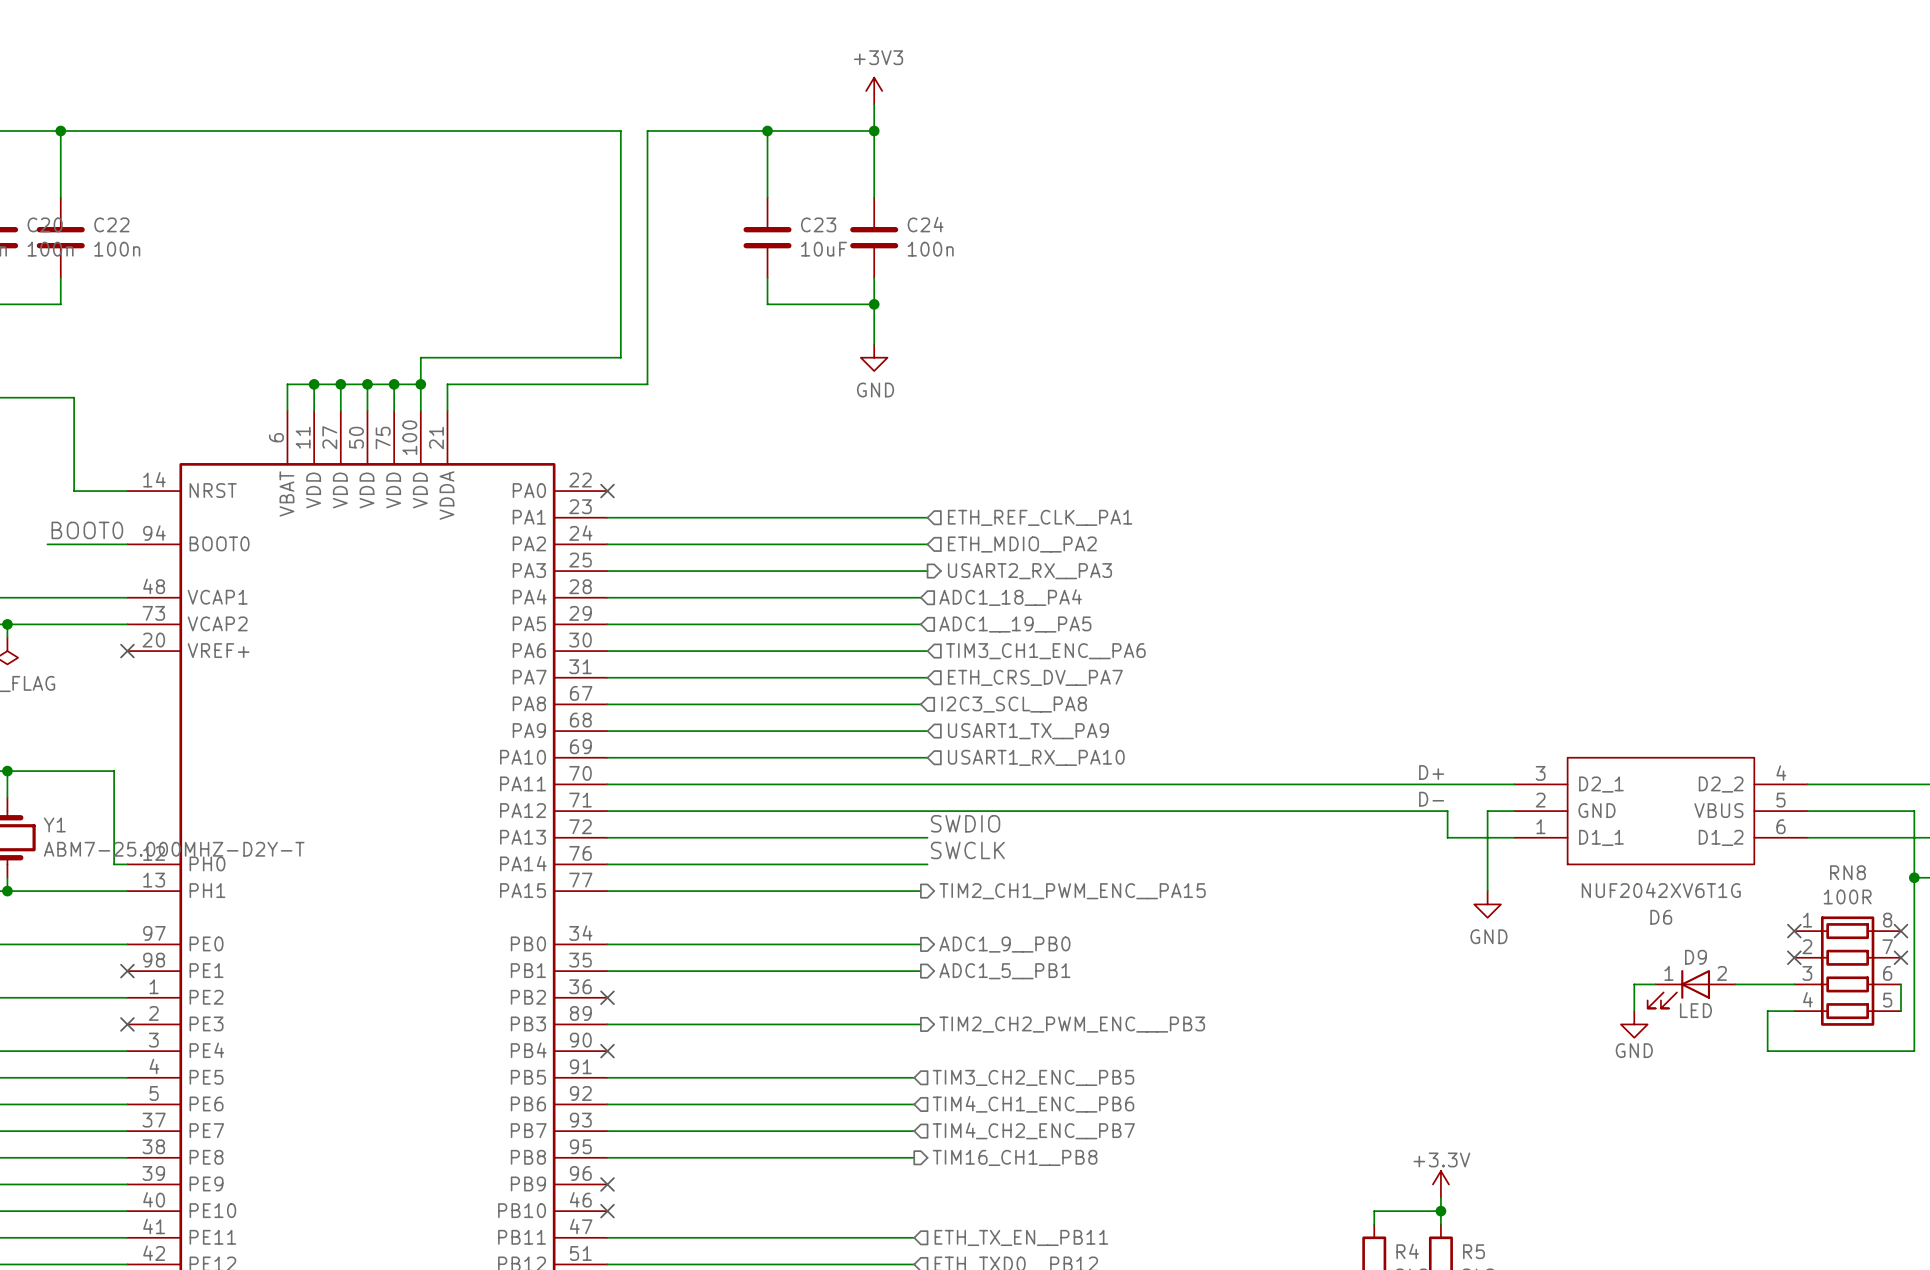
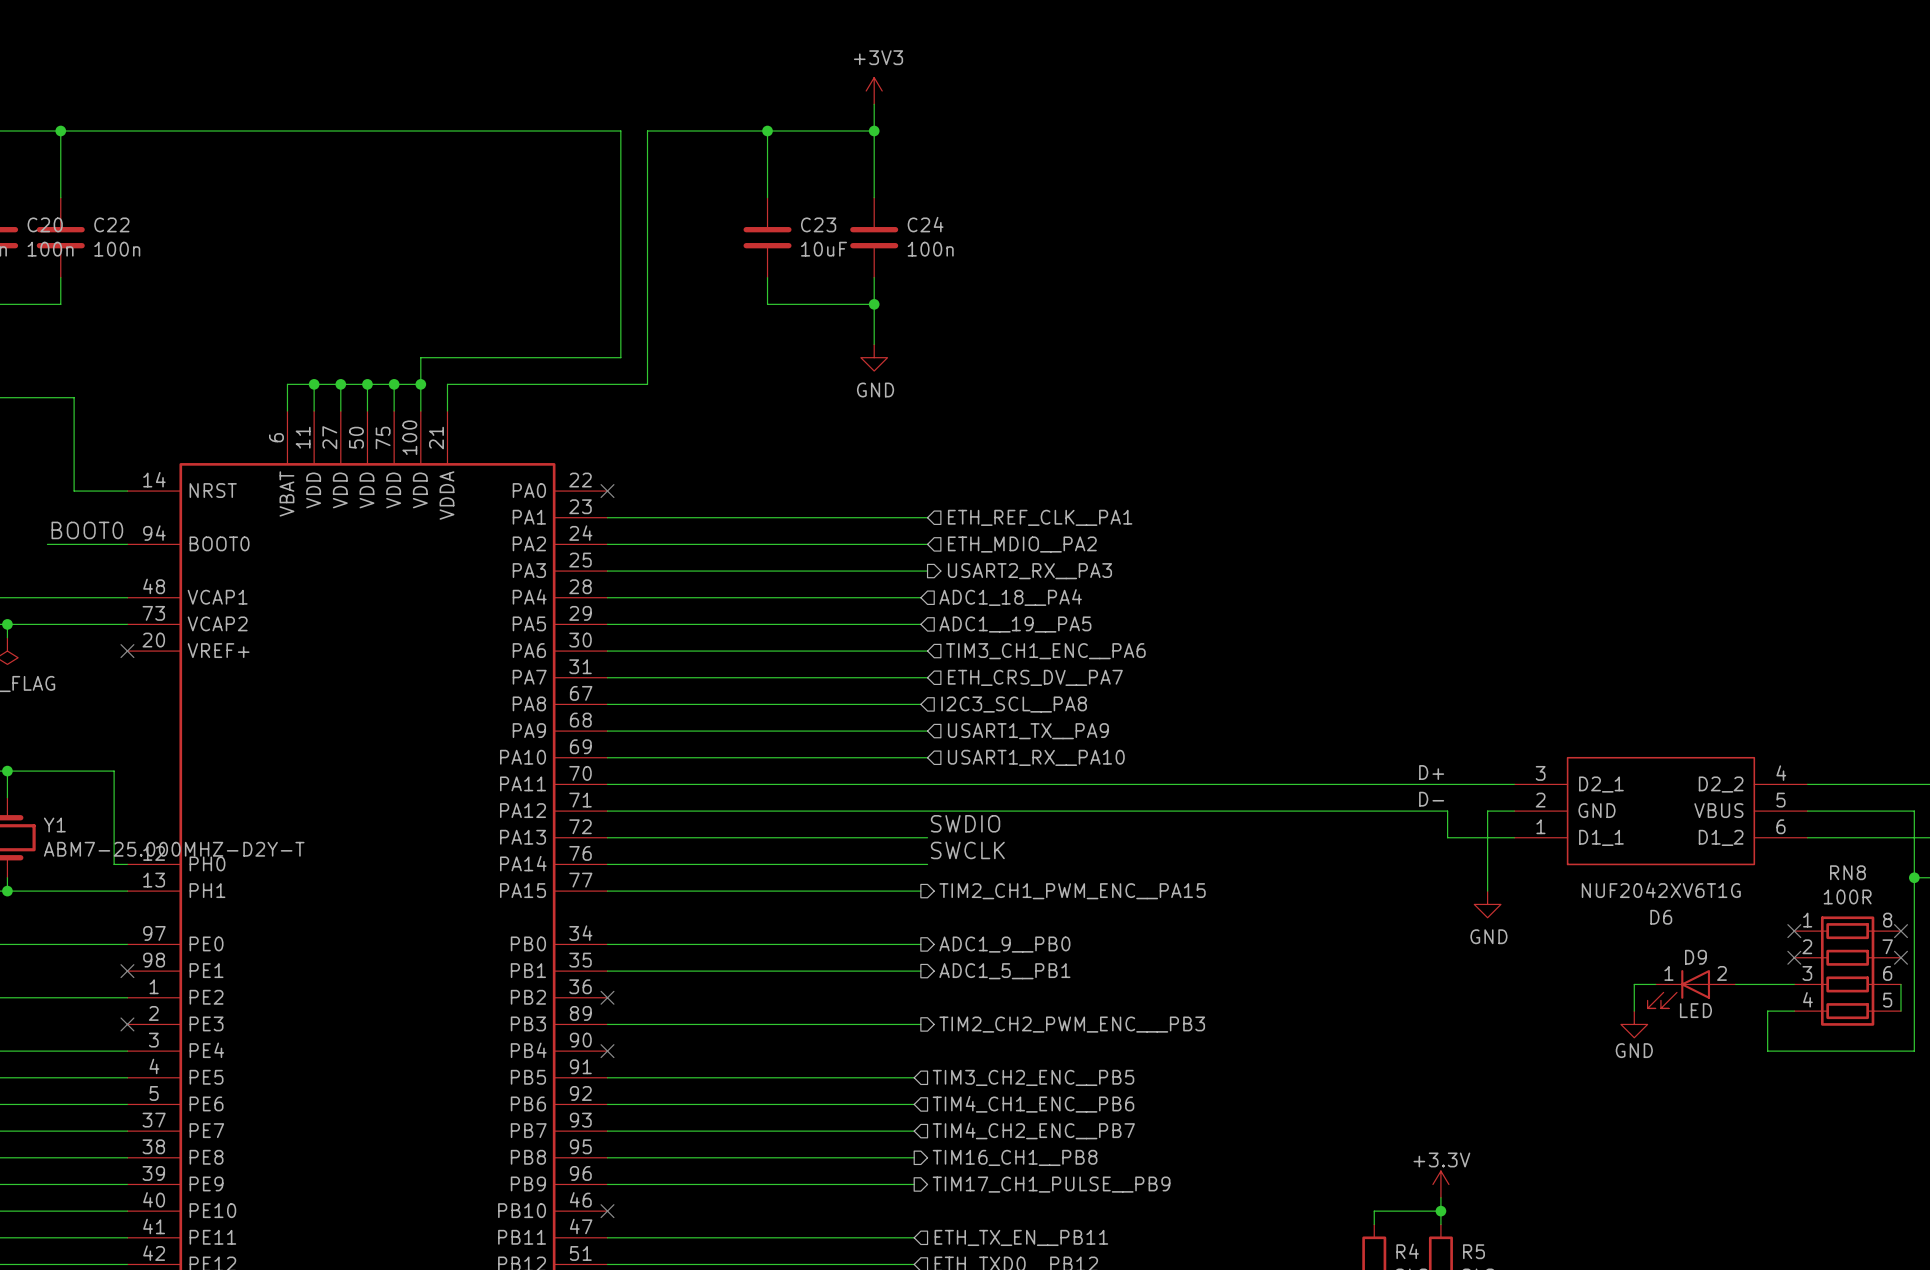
wire: none -> (607, 1184) (914, 1184)
no-connect mark: (607, 1184) -> none
hierarchical label: none -> TIM17_CH1_PULSE__PB9 (1051, 1184)

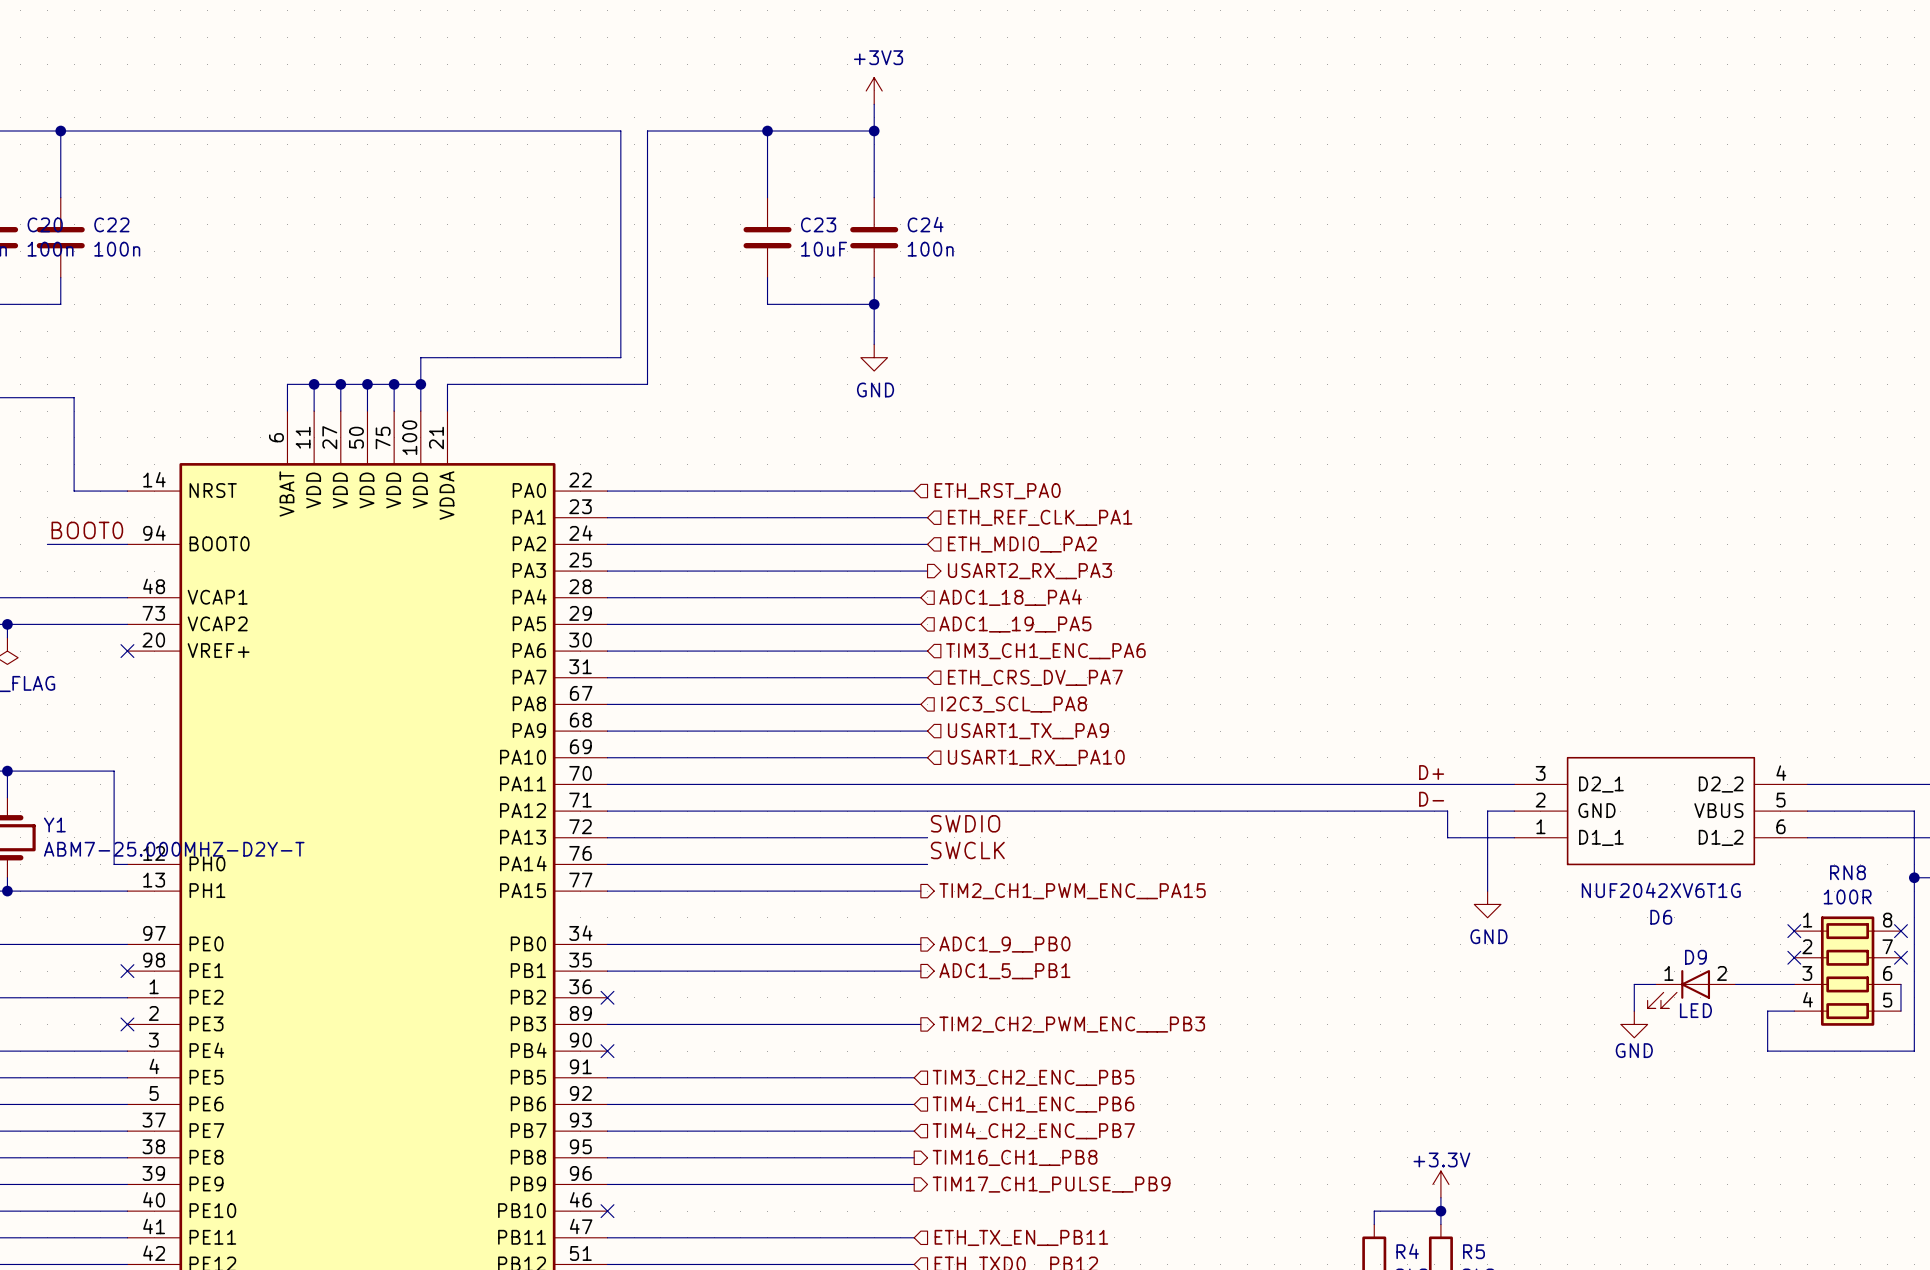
wire: none -> (607, 491) (914, 491)
no-connect mark: (607, 491) -> none
hierarchical label: none -> ETH_RST_PA0 (997, 491)

